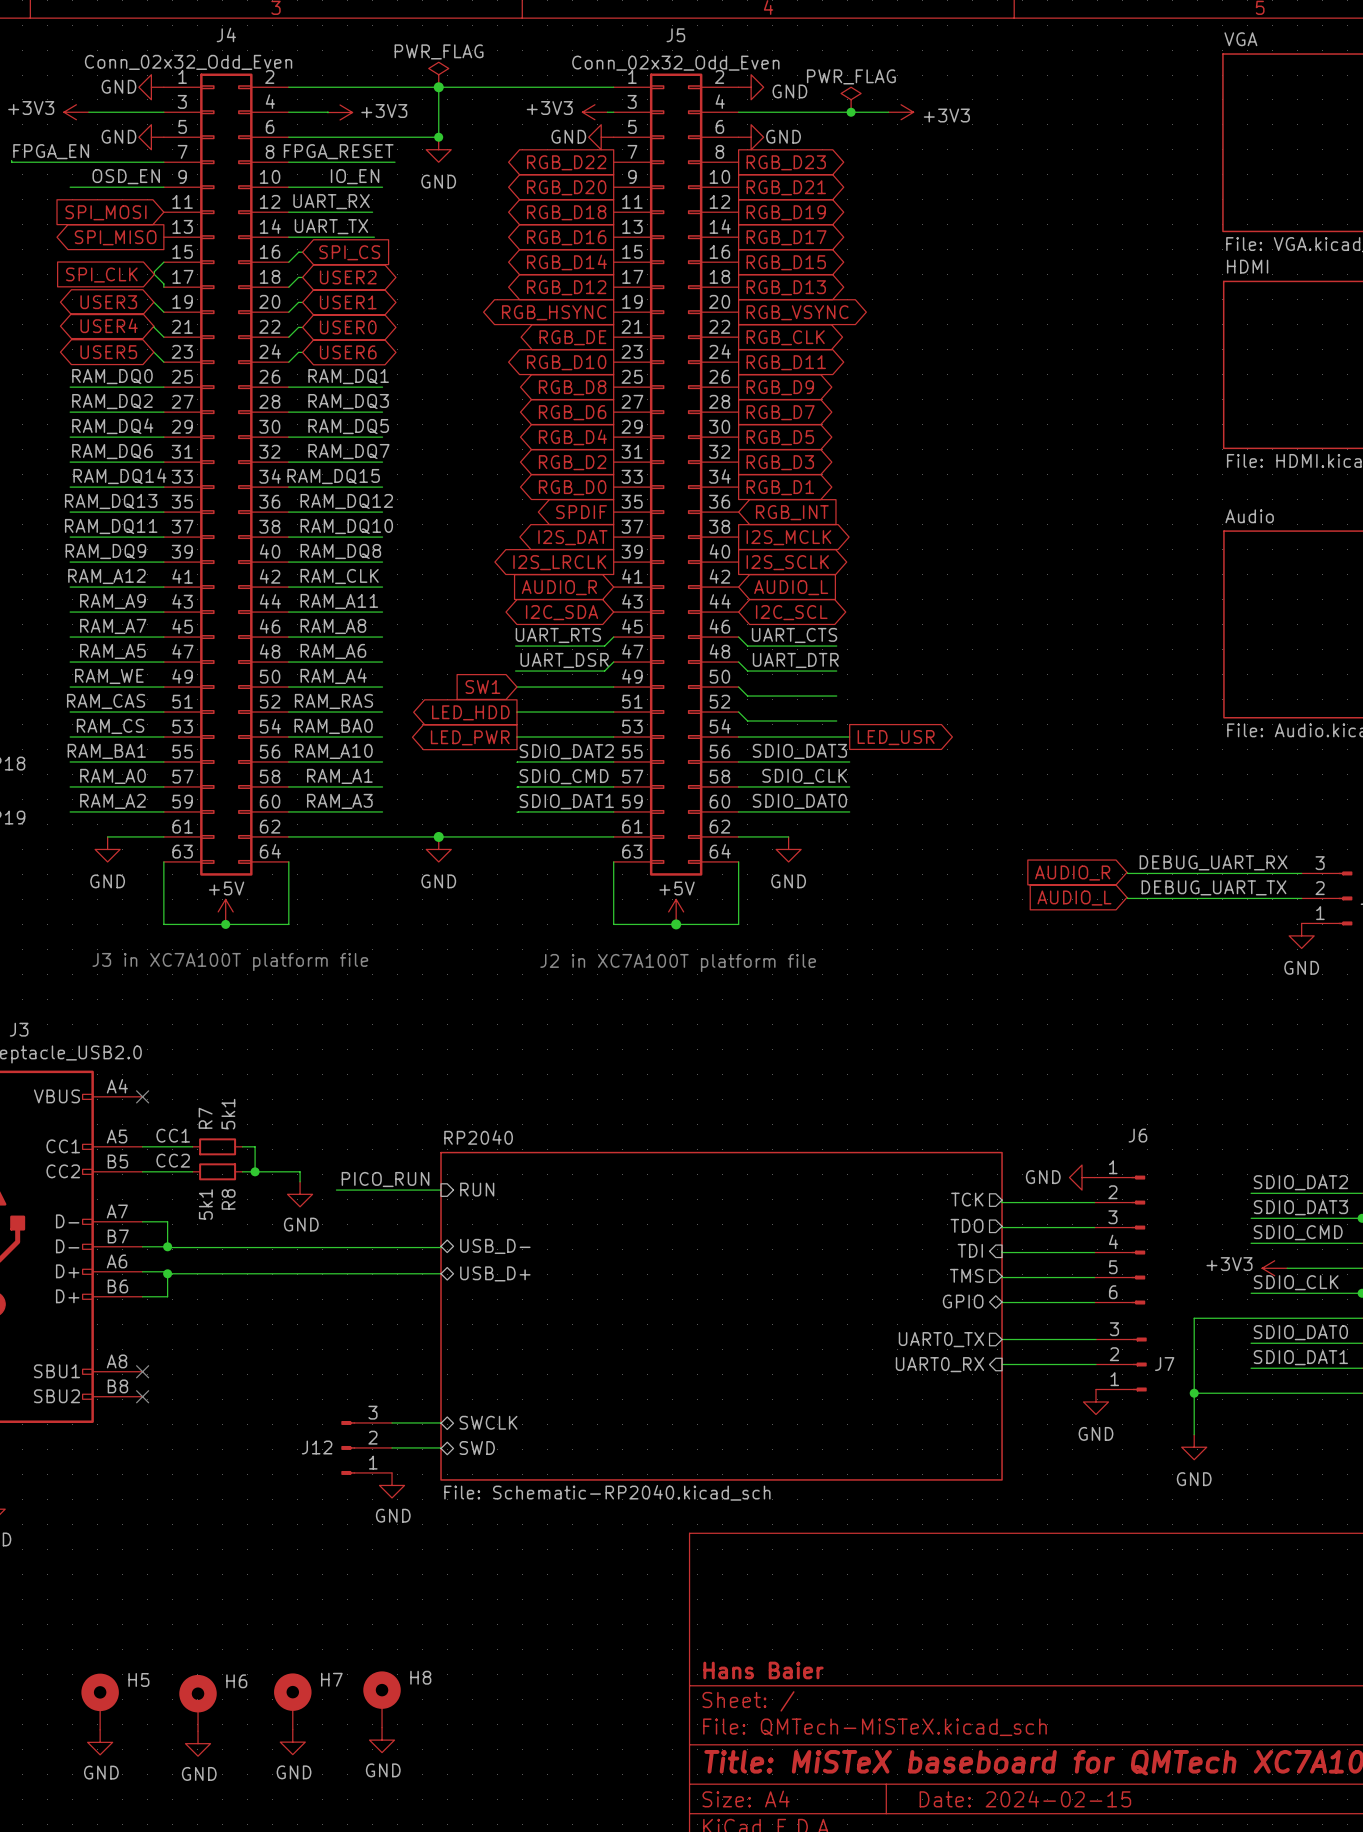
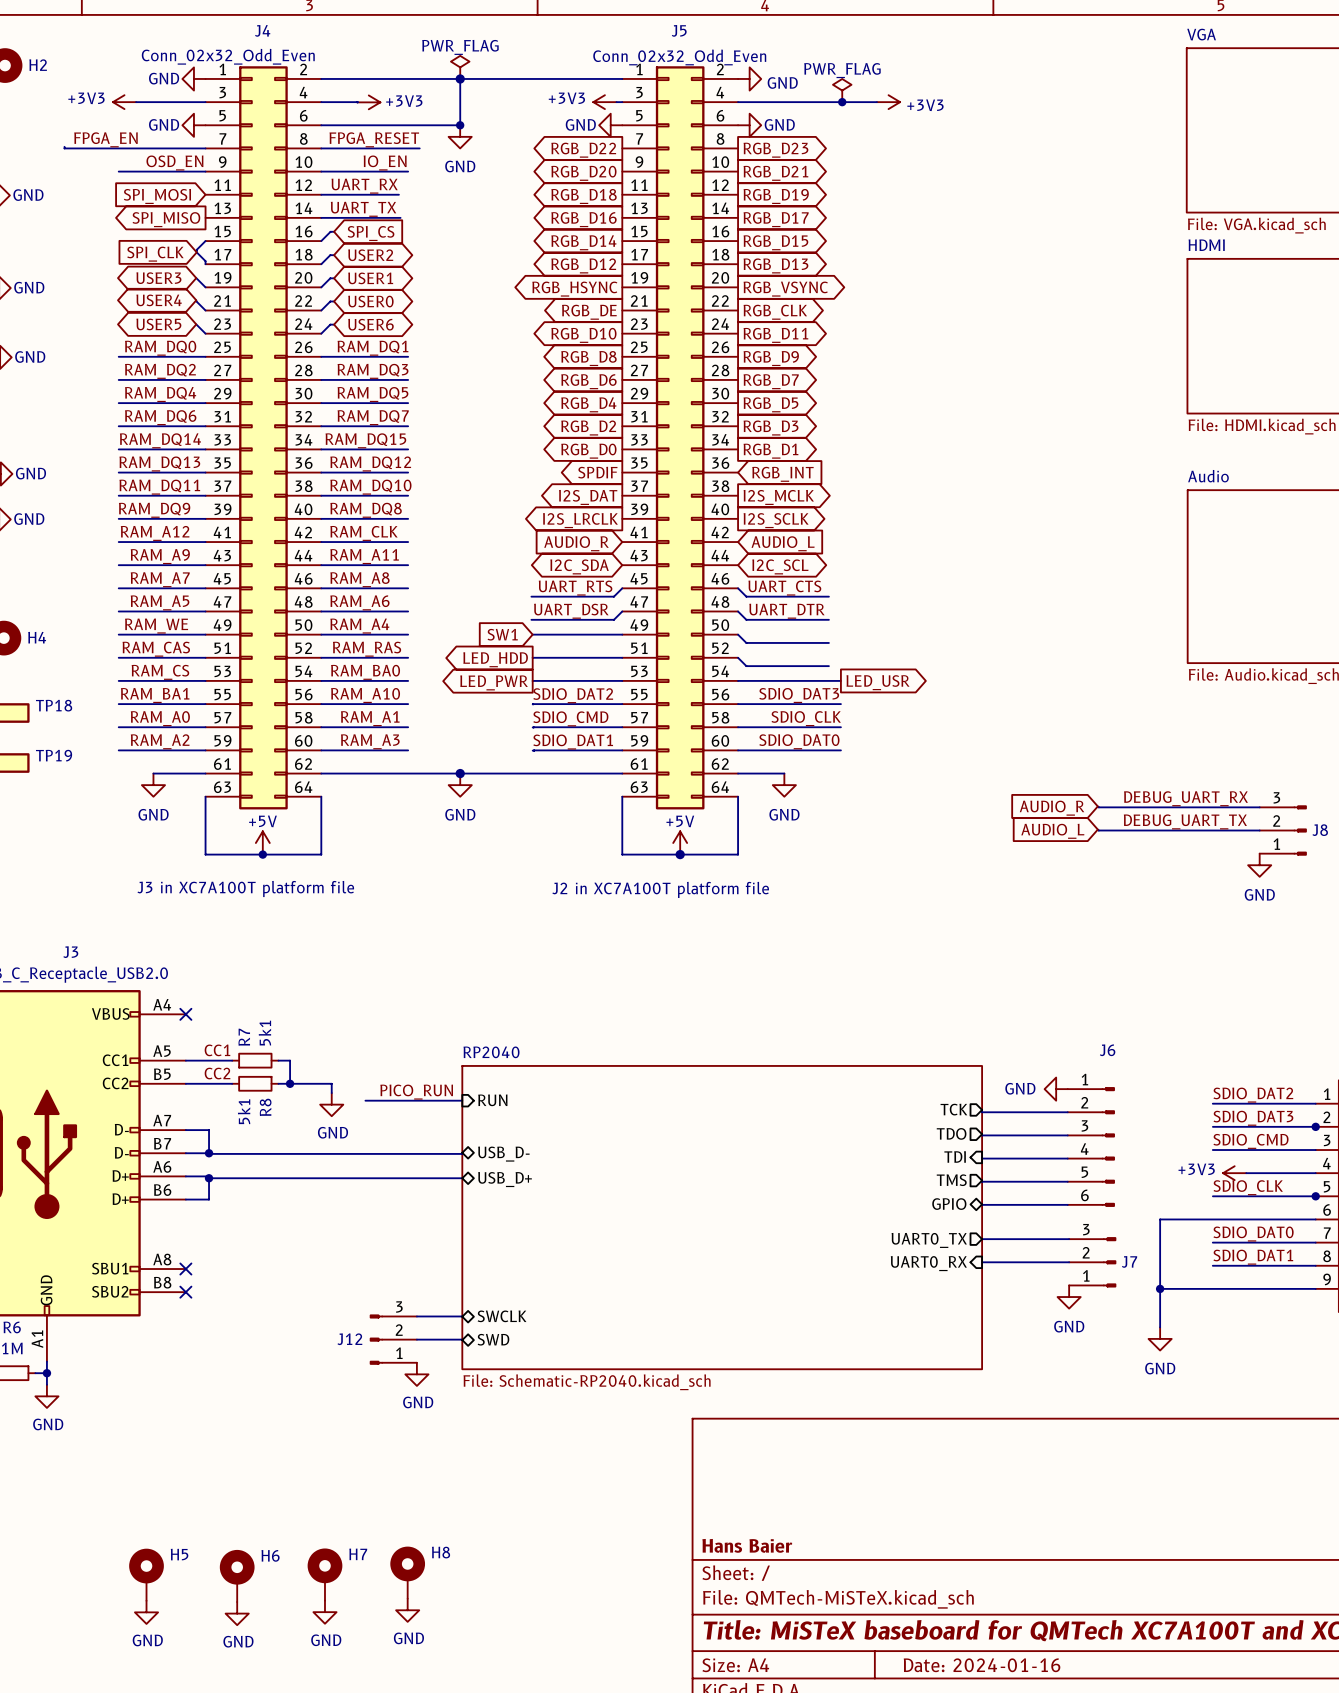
title block: Date: 2024-02-15 (1025, 1799) -> Date: 2024-01-16 (982, 1665)

